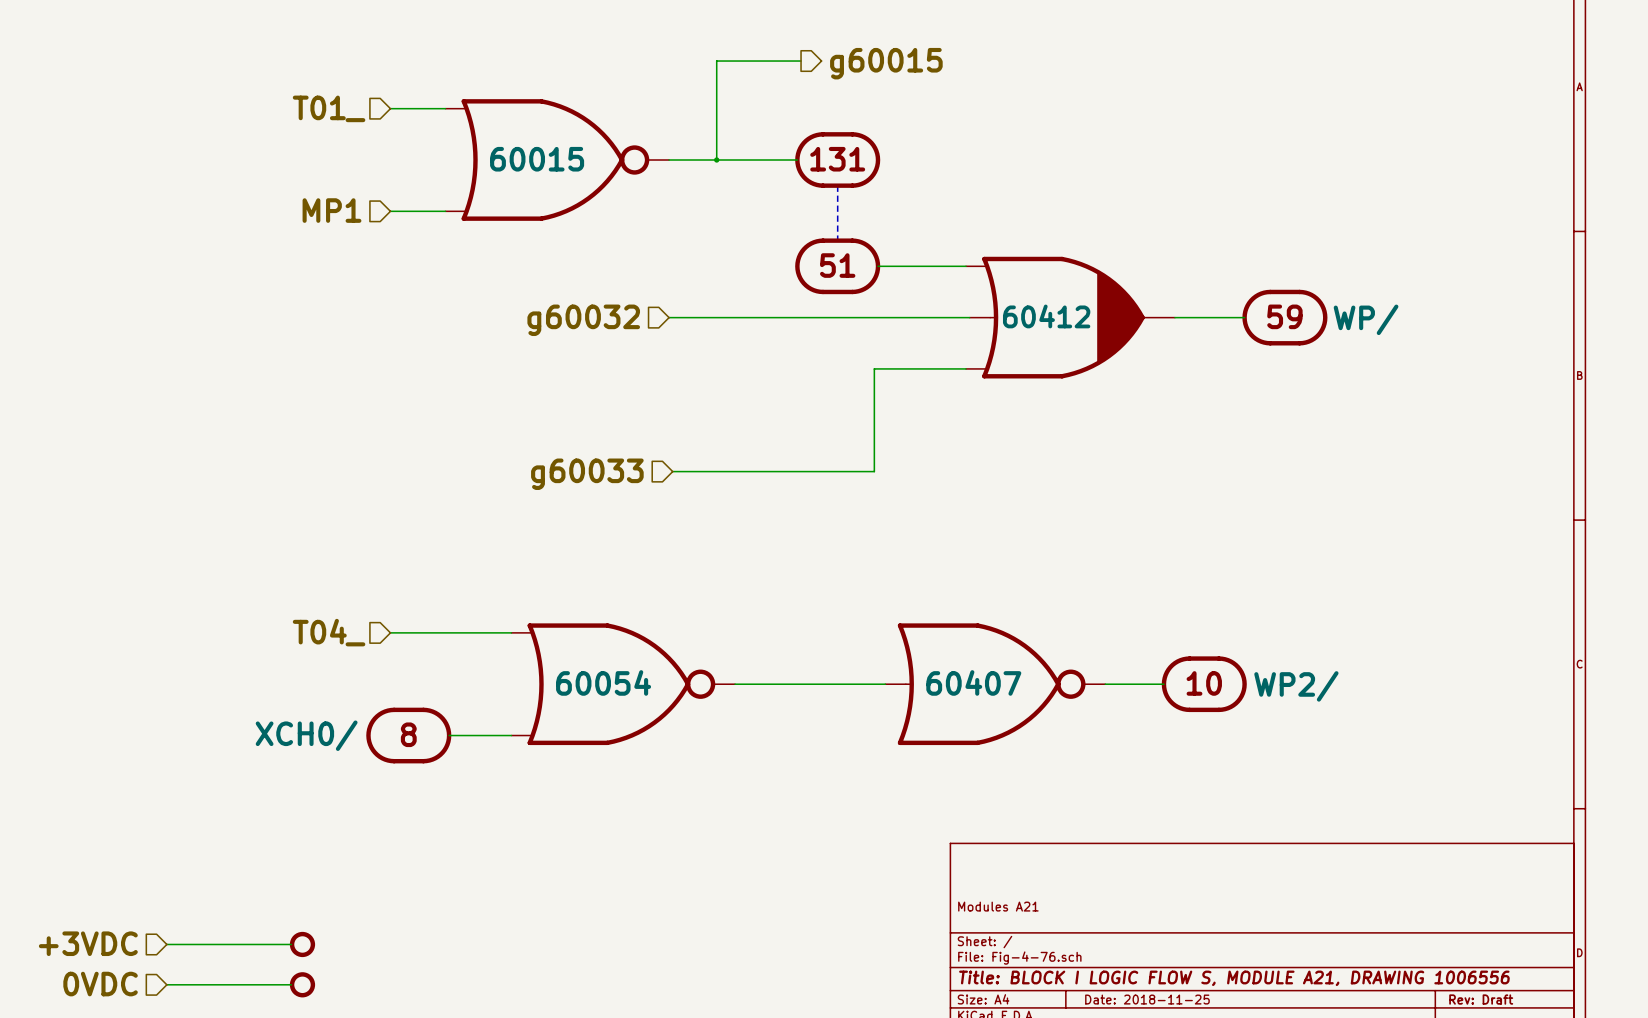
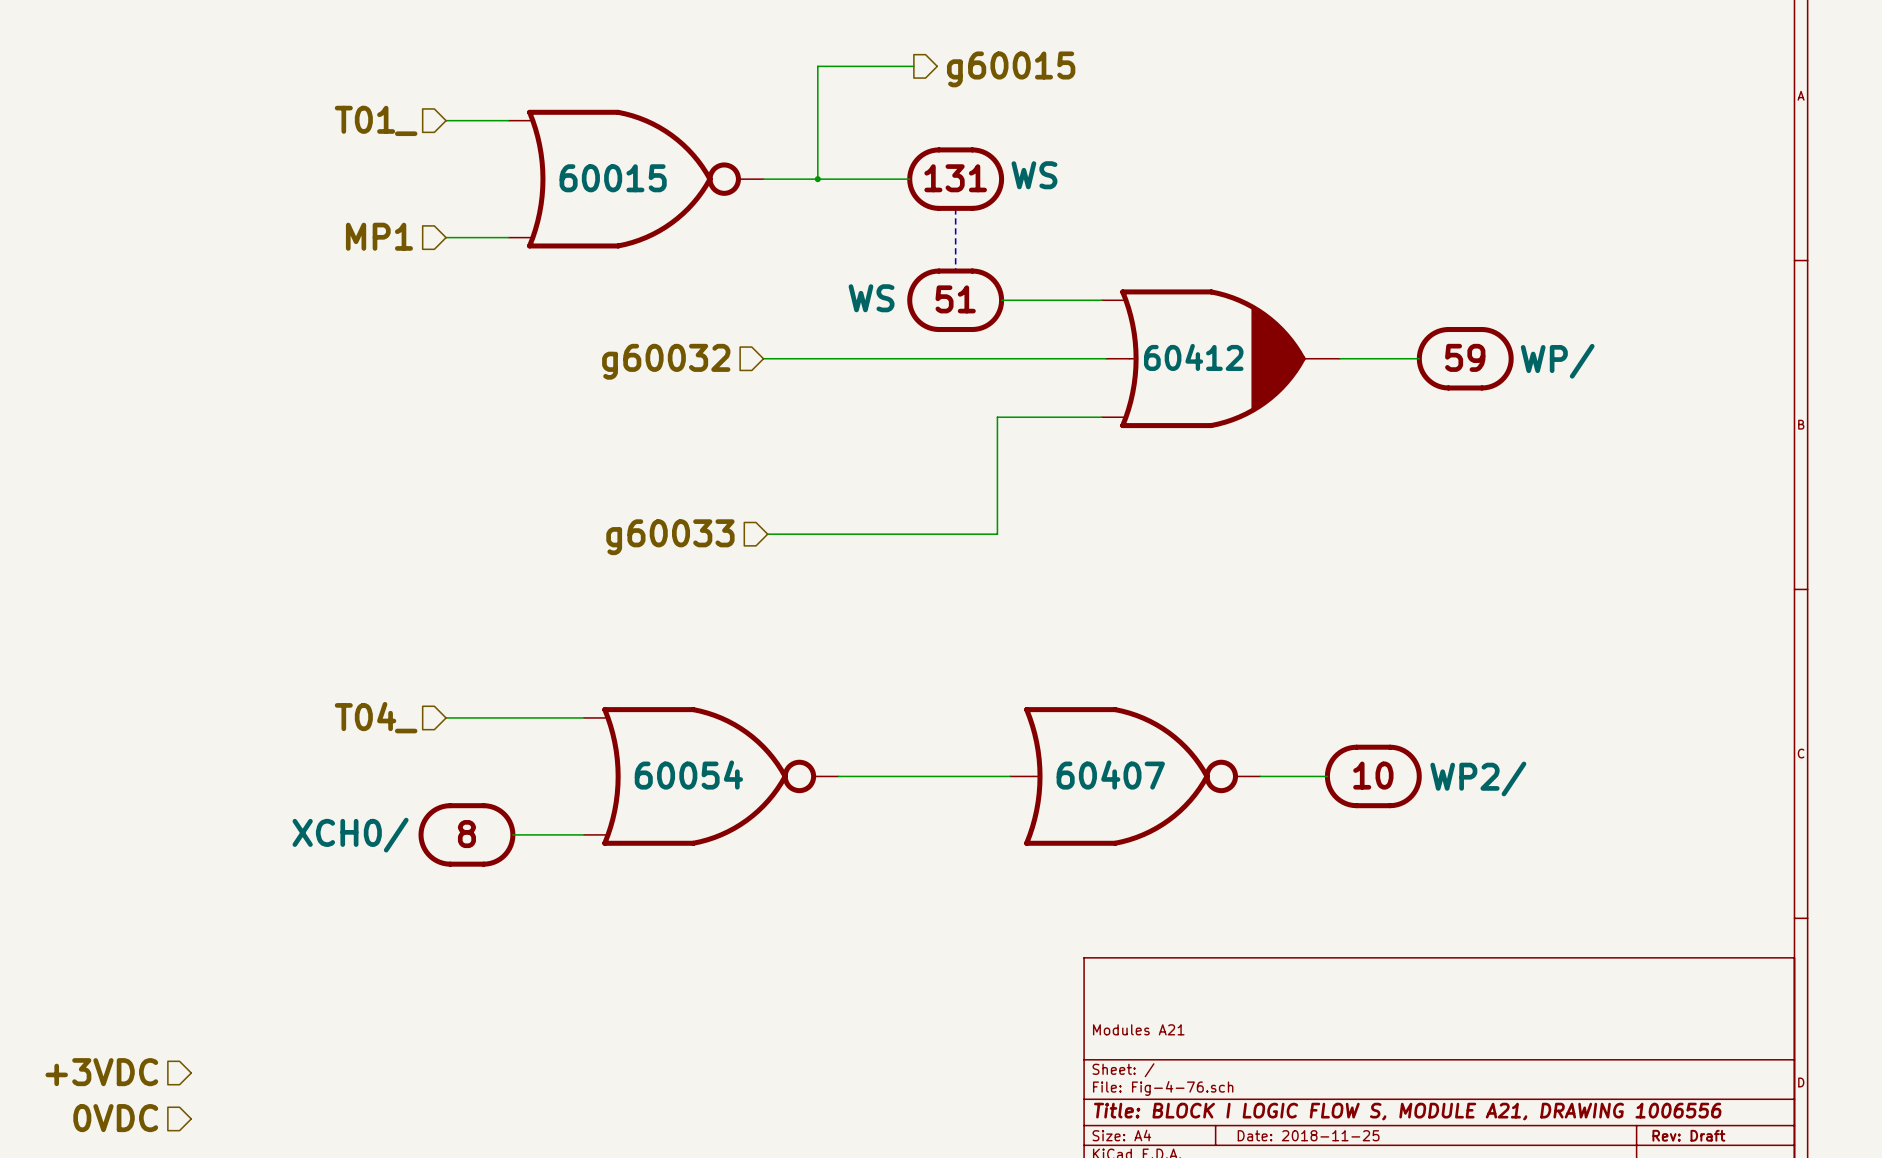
part text: none -> WS (1034, 175)
part text: none -> WS (871, 298)
wire: (166, 944) (291, 944) -> none
part: (302, 944) -> none
wire: (166, 984) (291, 984) -> none
part: (302, 984) -> none

